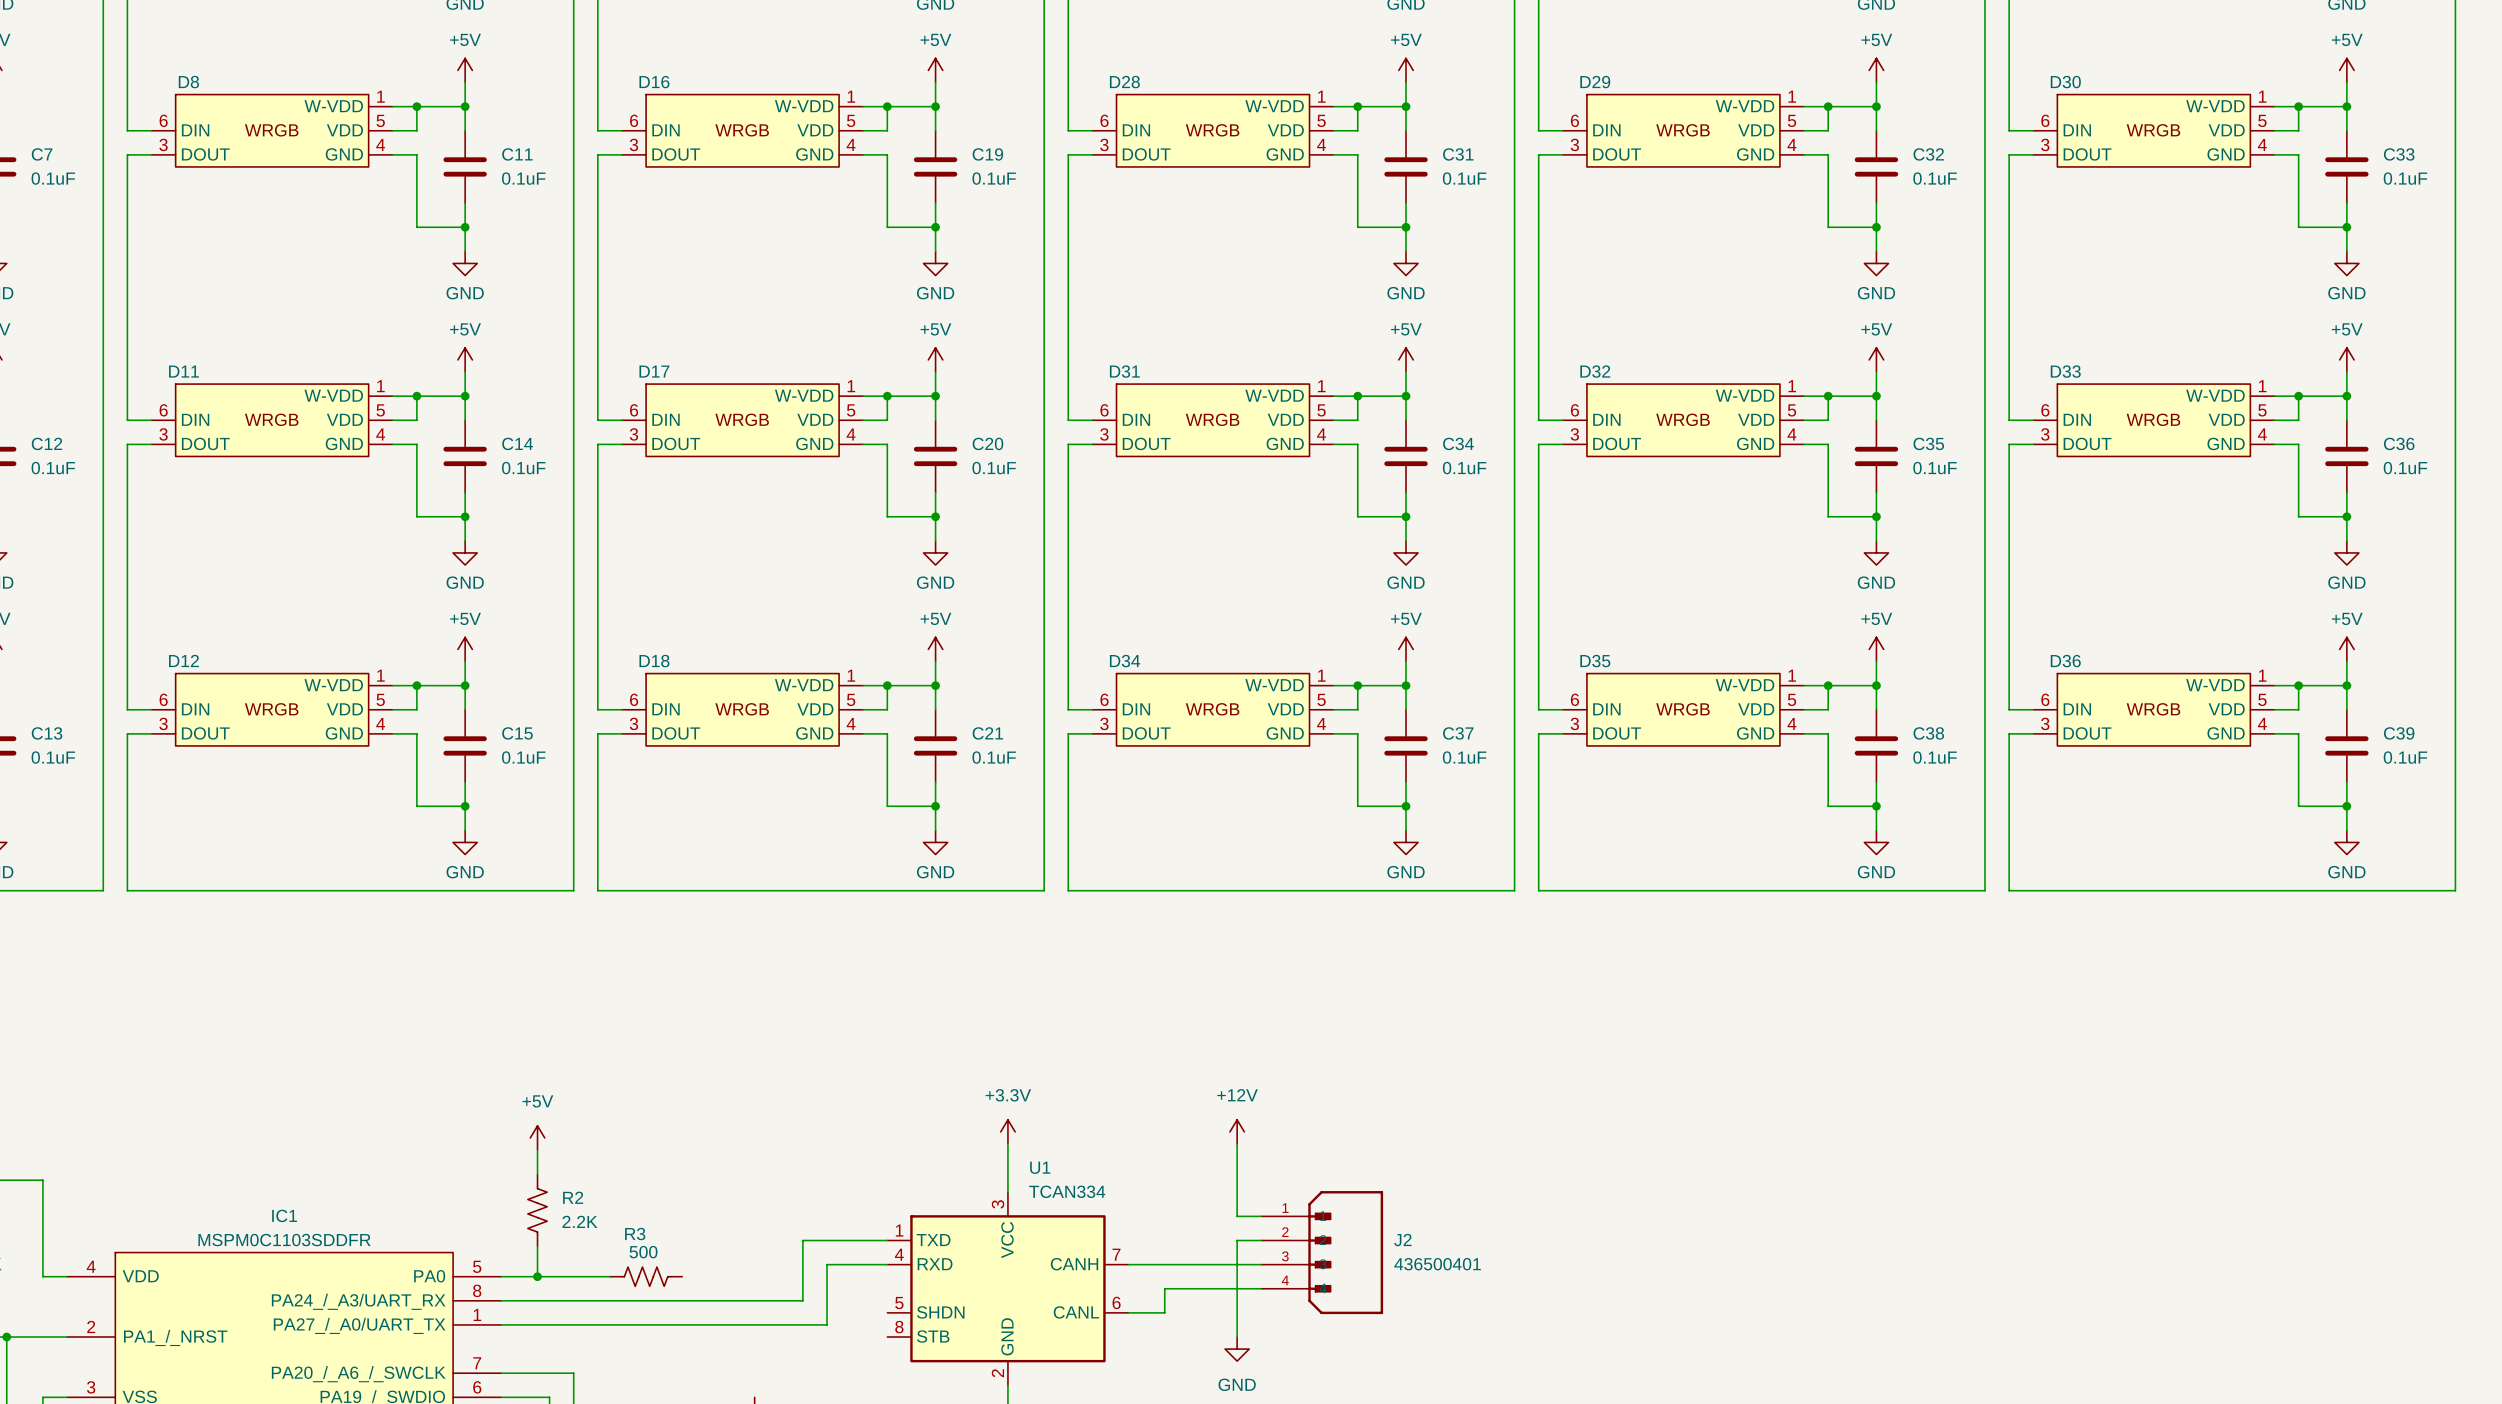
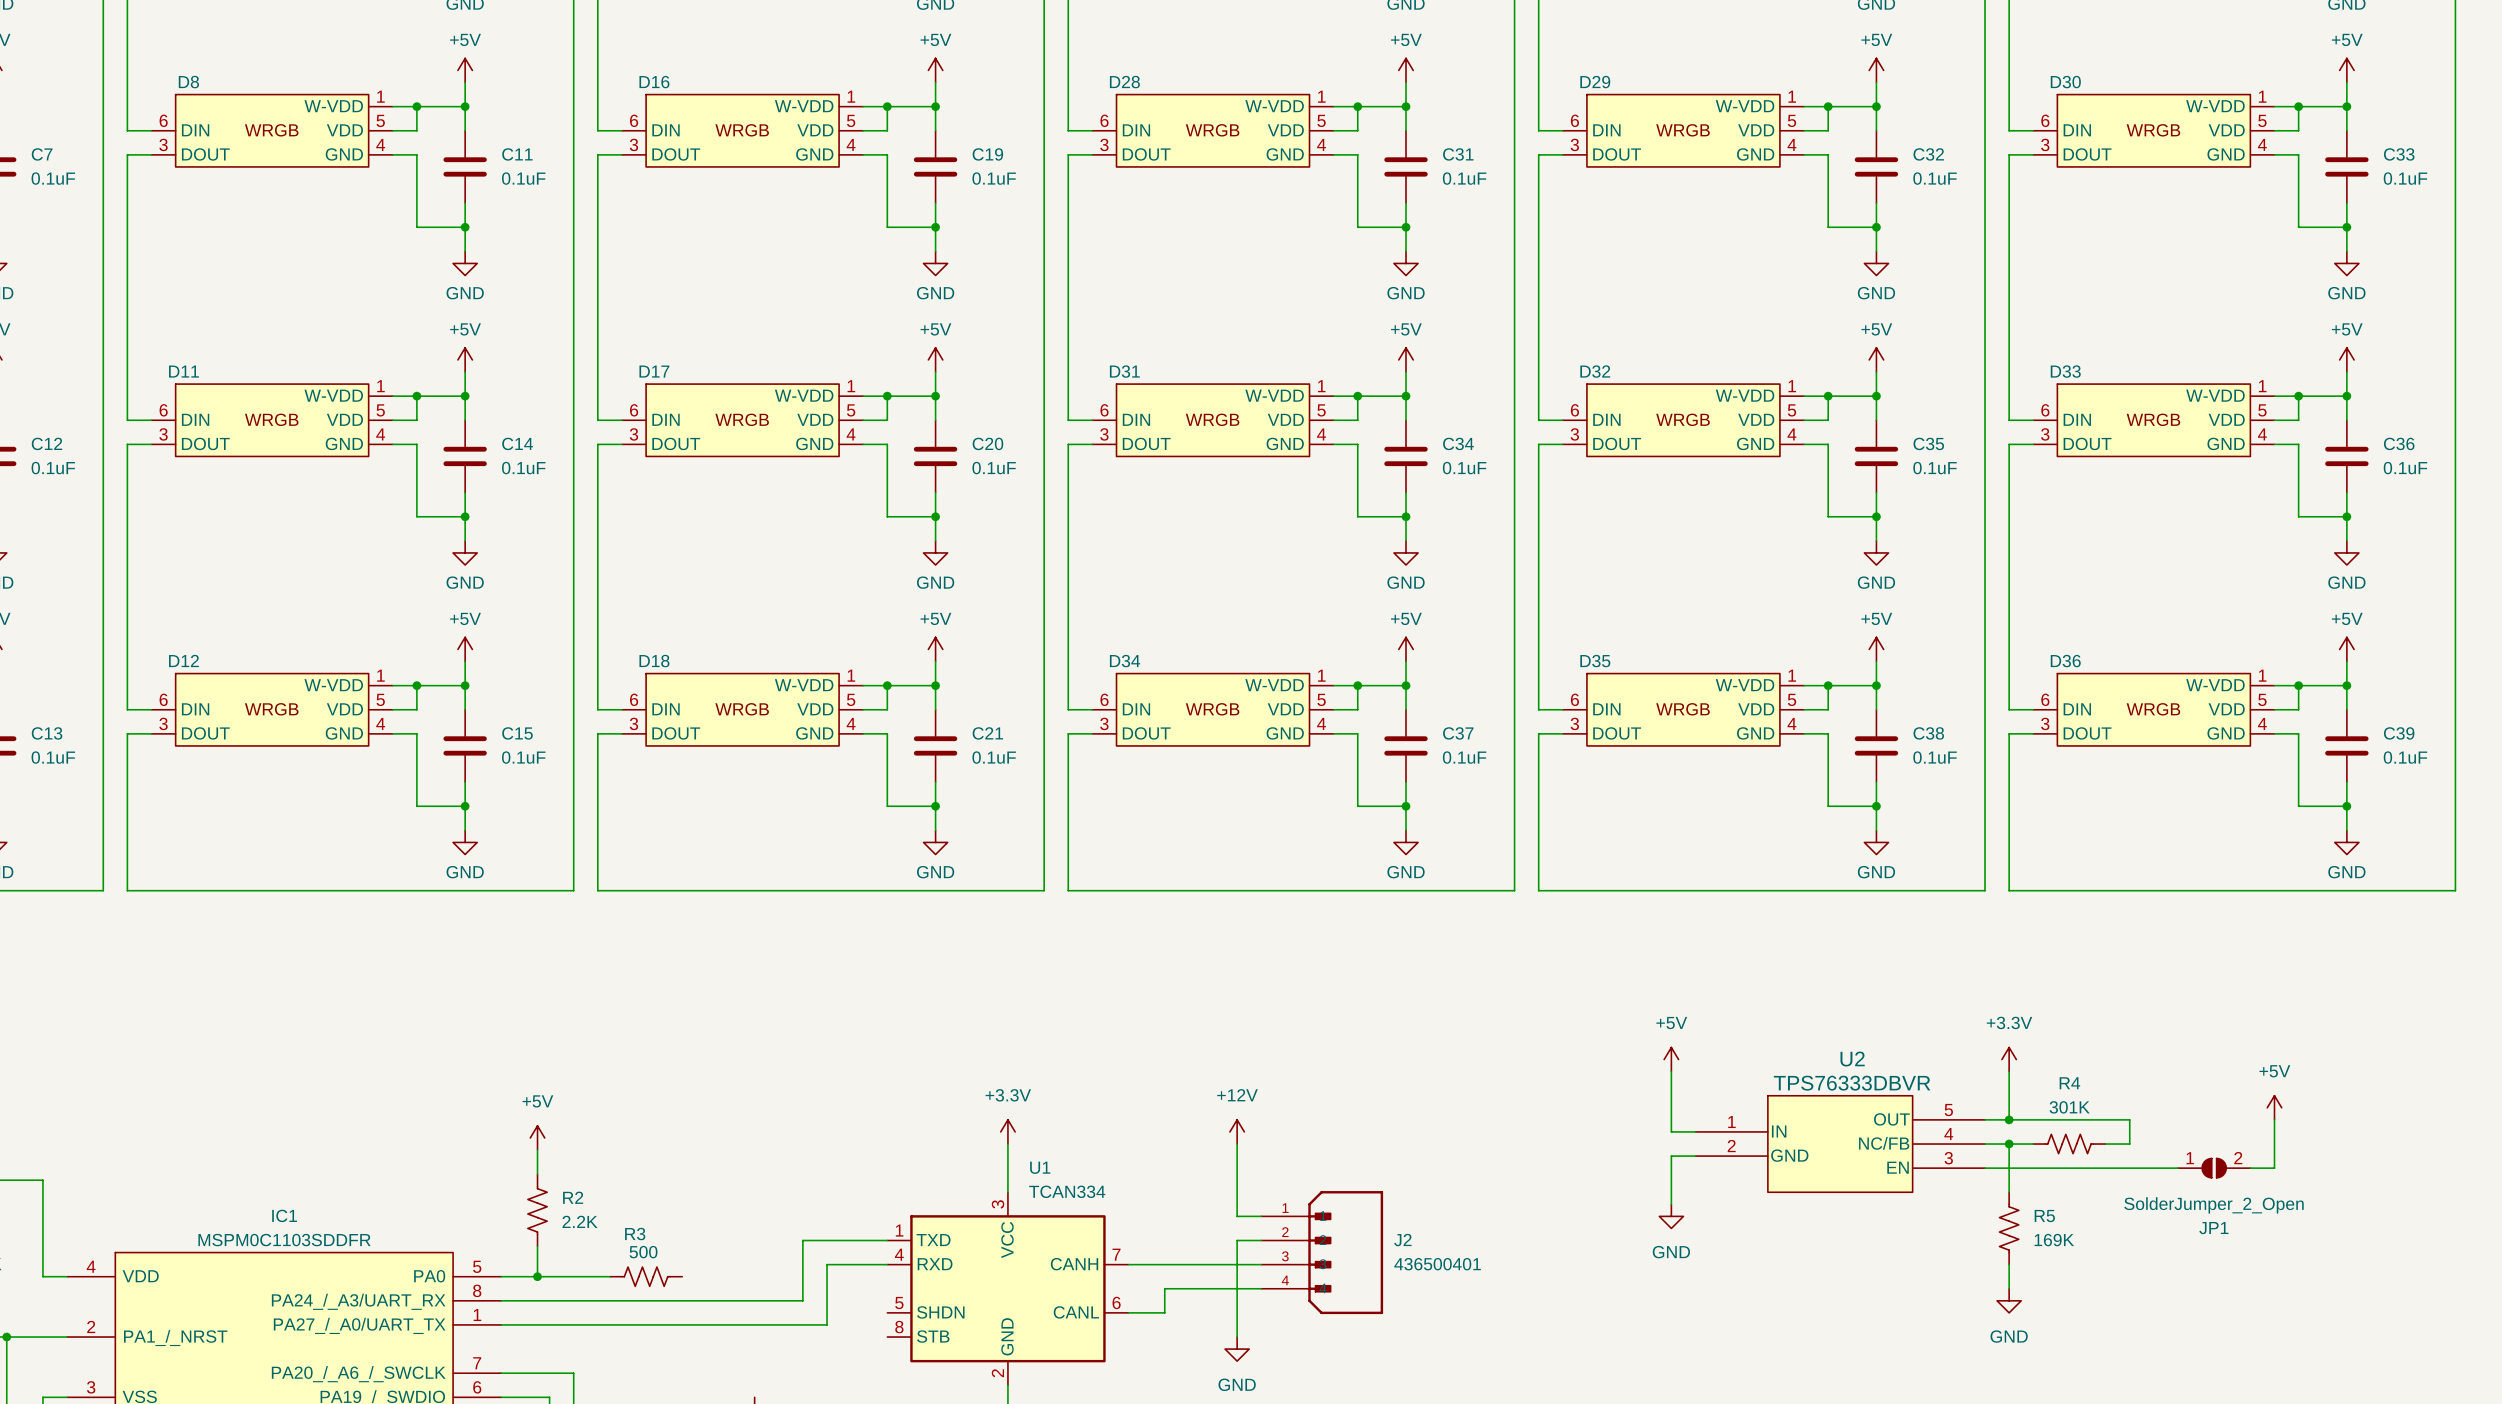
power symbol: none -> +5V (1671, 1059)
power symbol: none -> +3.3V (2009, 1059)
wire: none -> (1671, 1071) (1671, 1131) (1695, 1131)
wire: none -> (2009, 1071) (2009, 1119)
power symbol: none -> +5V (2274, 1107)
wire: none -> (1985, 1119) (2129, 1119) (2129, 1144) (2105, 1144)
junction: none -> (2009, 1119)
wire: none -> (2274, 1119) (2274, 1168) (2250, 1168)
U2: none -> TPS76333DBVR (1840, 1144)
wire: none -> (1985, 1144) (2033, 1144)
wire: none -> (2009, 1144) (2009, 1192)
junction: none -> (2009, 1144)
R4: none -> 301K (2069, 1144)
wire: none -> (1695, 1156) (1671, 1156) (1671, 1204)
wire: none -> (1985, 1168) (2178, 1168)
JP1: none -> SolderJumper_2_Open (2214, 1168)
power symbol: none -> GND (1671, 1216)
R5: none -> 169K (2009, 1228)
wire: none -> (2009, 1264) (2009, 1288)
power symbol: none -> GND (2009, 1300)

